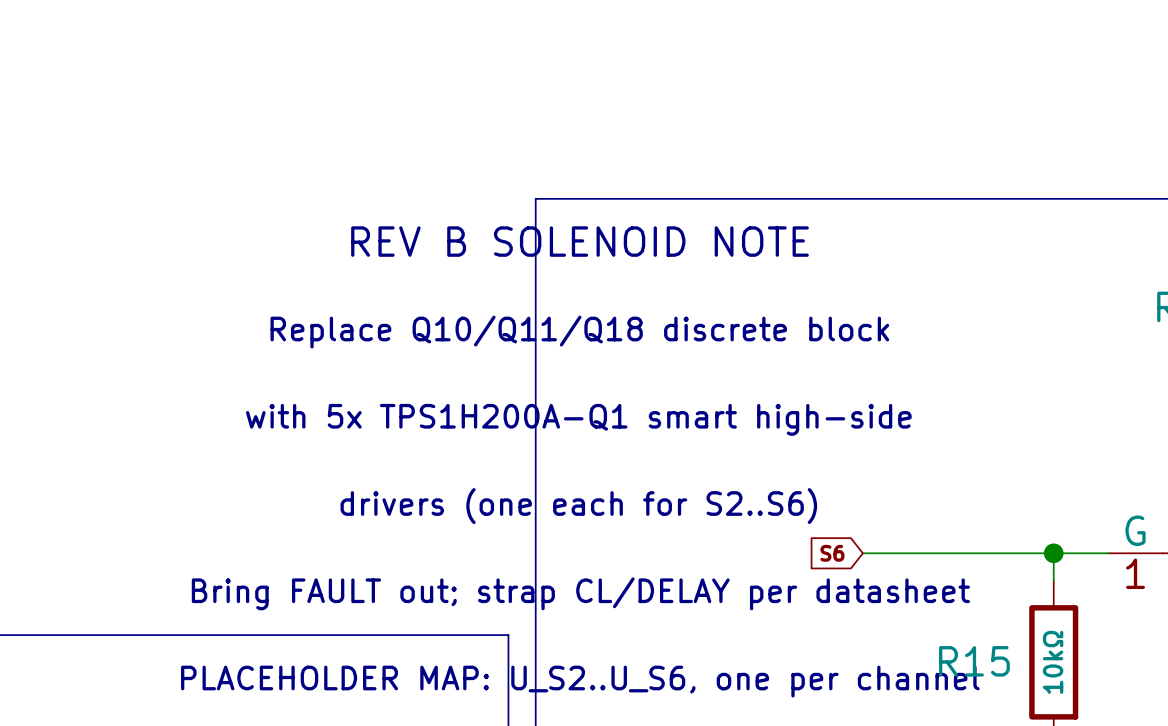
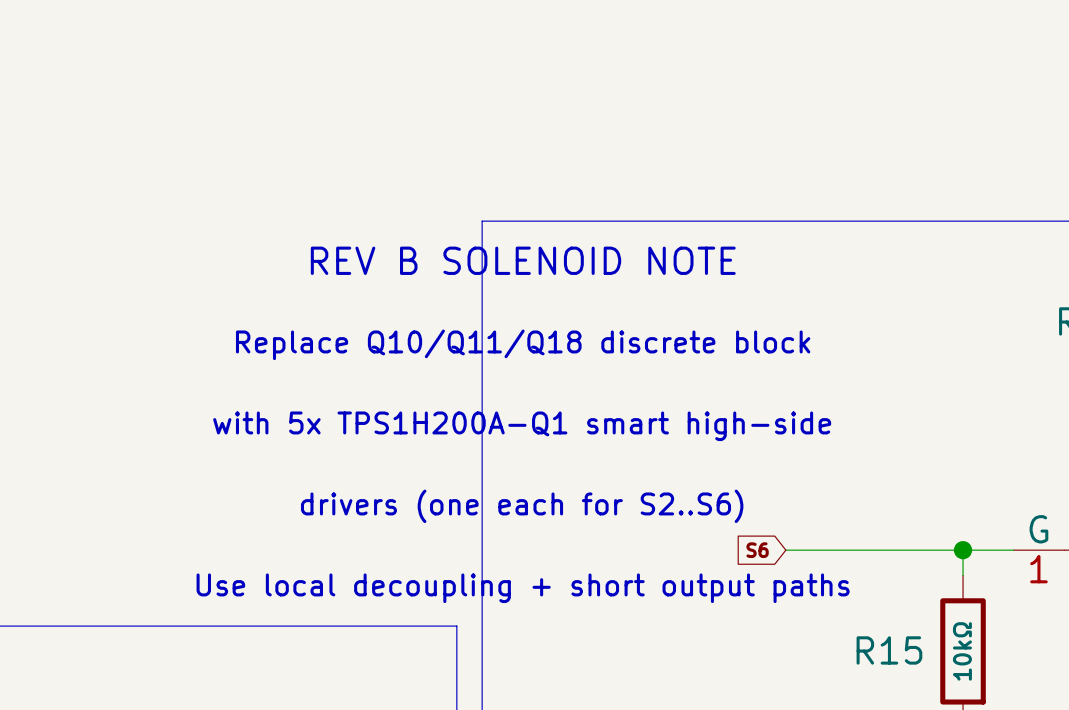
text: Bring FAULT out; strap CL/DELAY per datasheet (580, 593) -> Use local decoupling + short output paths (523, 588)
text: PLACEHOLDER MAP: U_S2..U_S6, one per channel (580, 681) -> none

